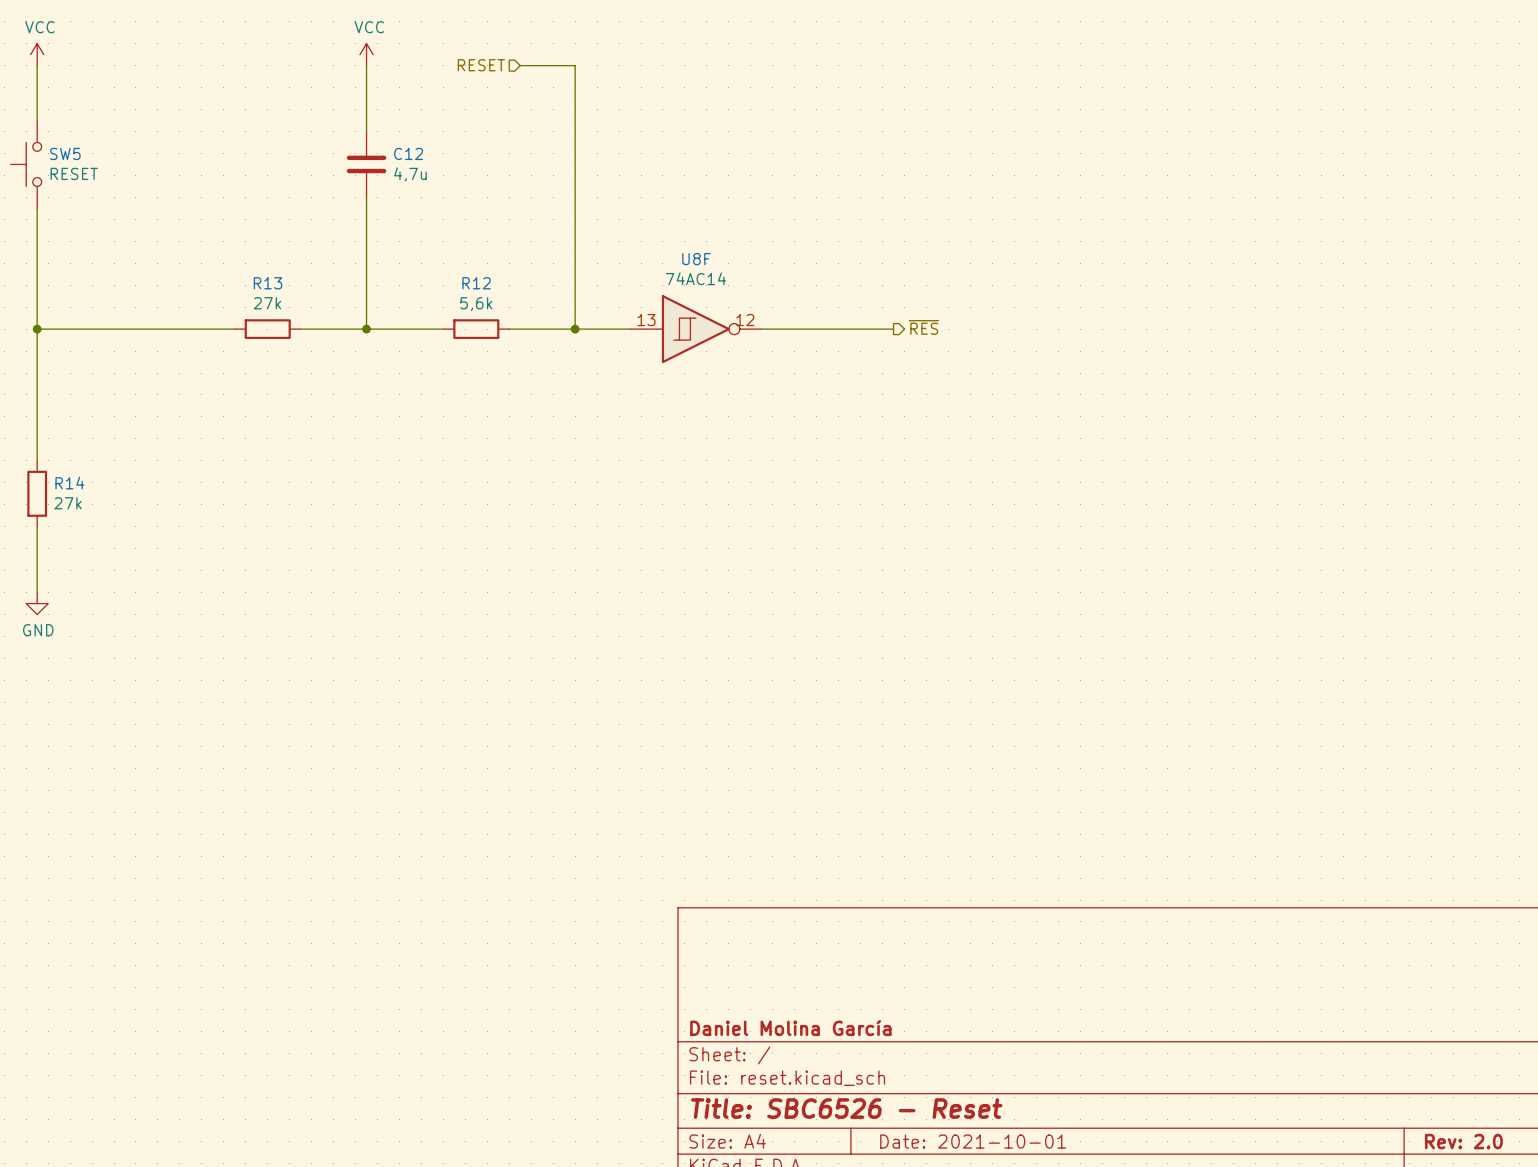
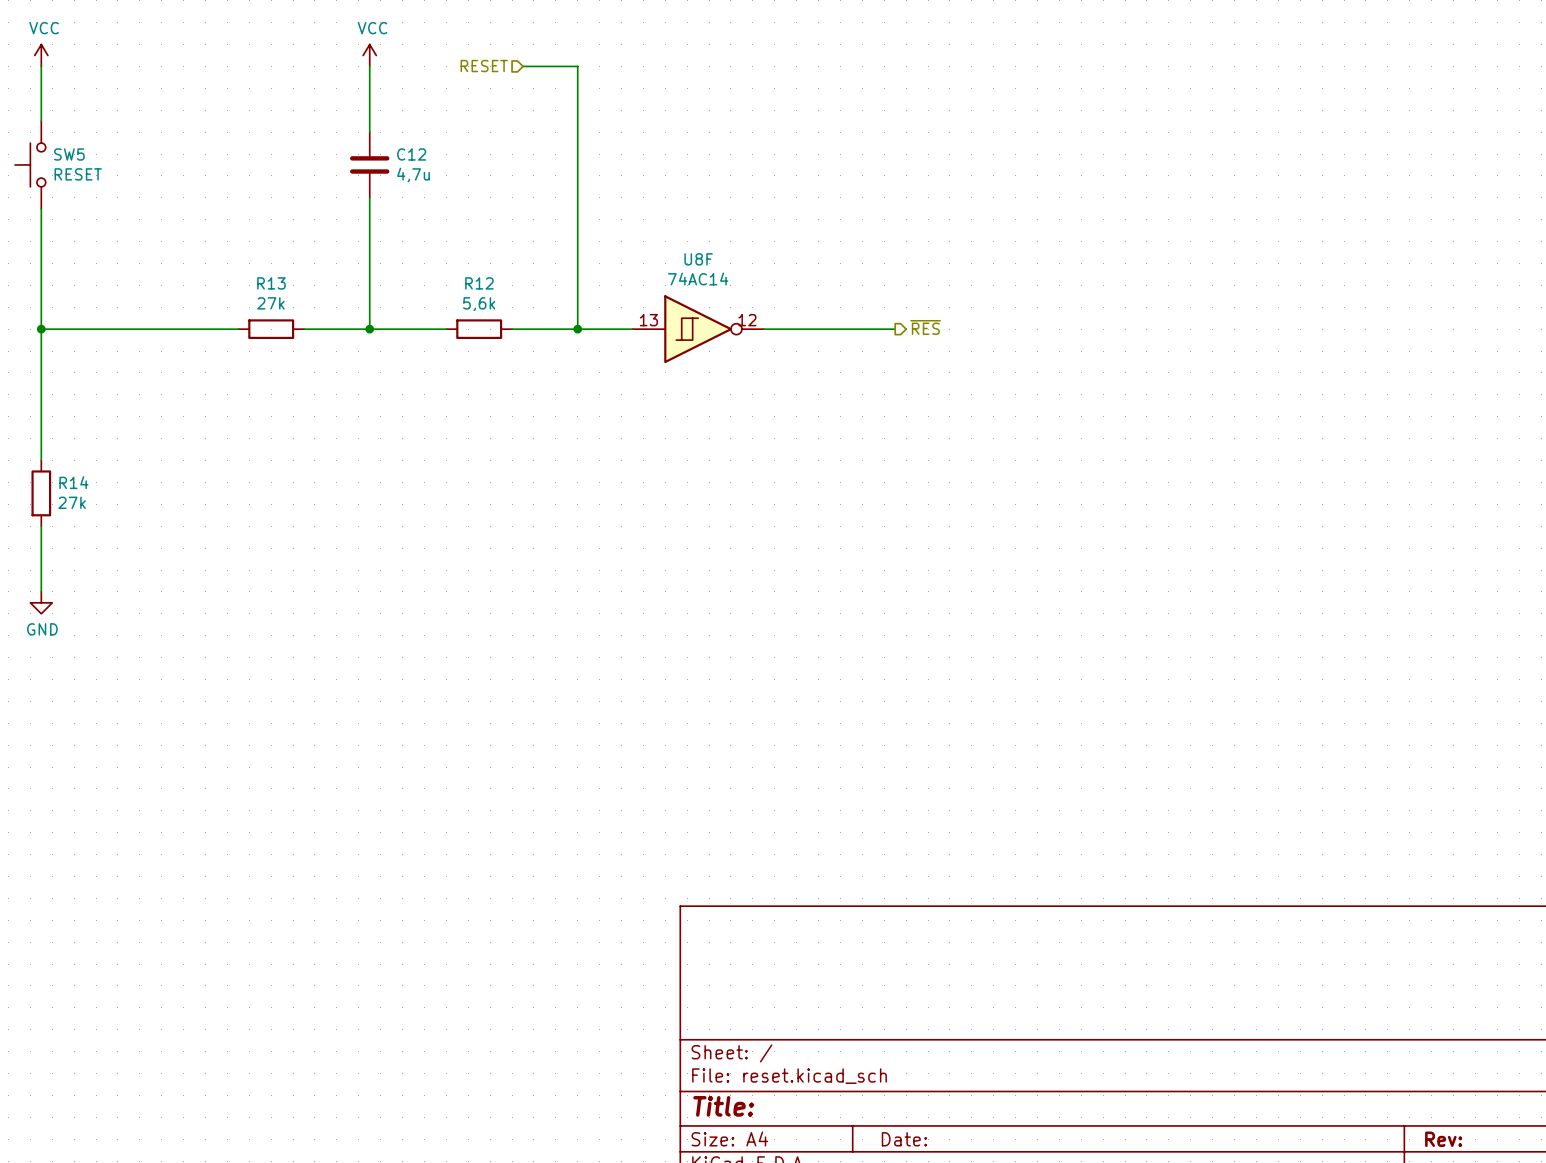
title block: Daniel Molina García (790, 1028) -> none
title block: Title: SBC6526 - Reset (846, 1108) -> Title: (723, 1106)
title block: Date: 2021-10-01 (973, 1141) -> Date: (904, 1139)
title block: Rev: 2.0 (1463, 1141) -> Rev: (1443, 1139)

